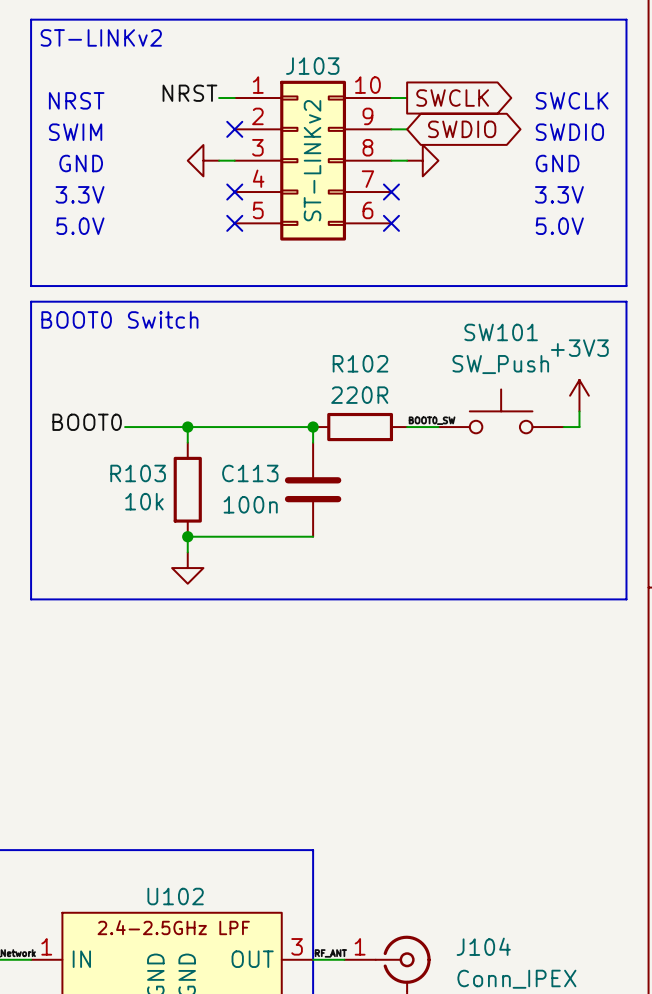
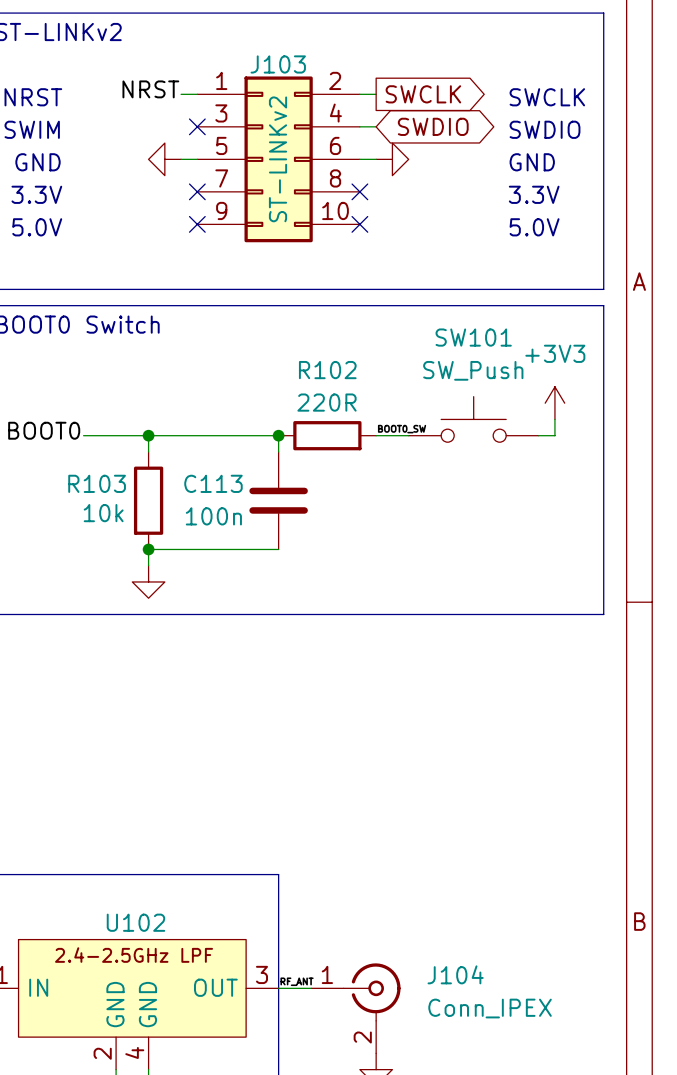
J103 symbol: [234, 80, 392, 241] -> [197, 76, 360, 243]

